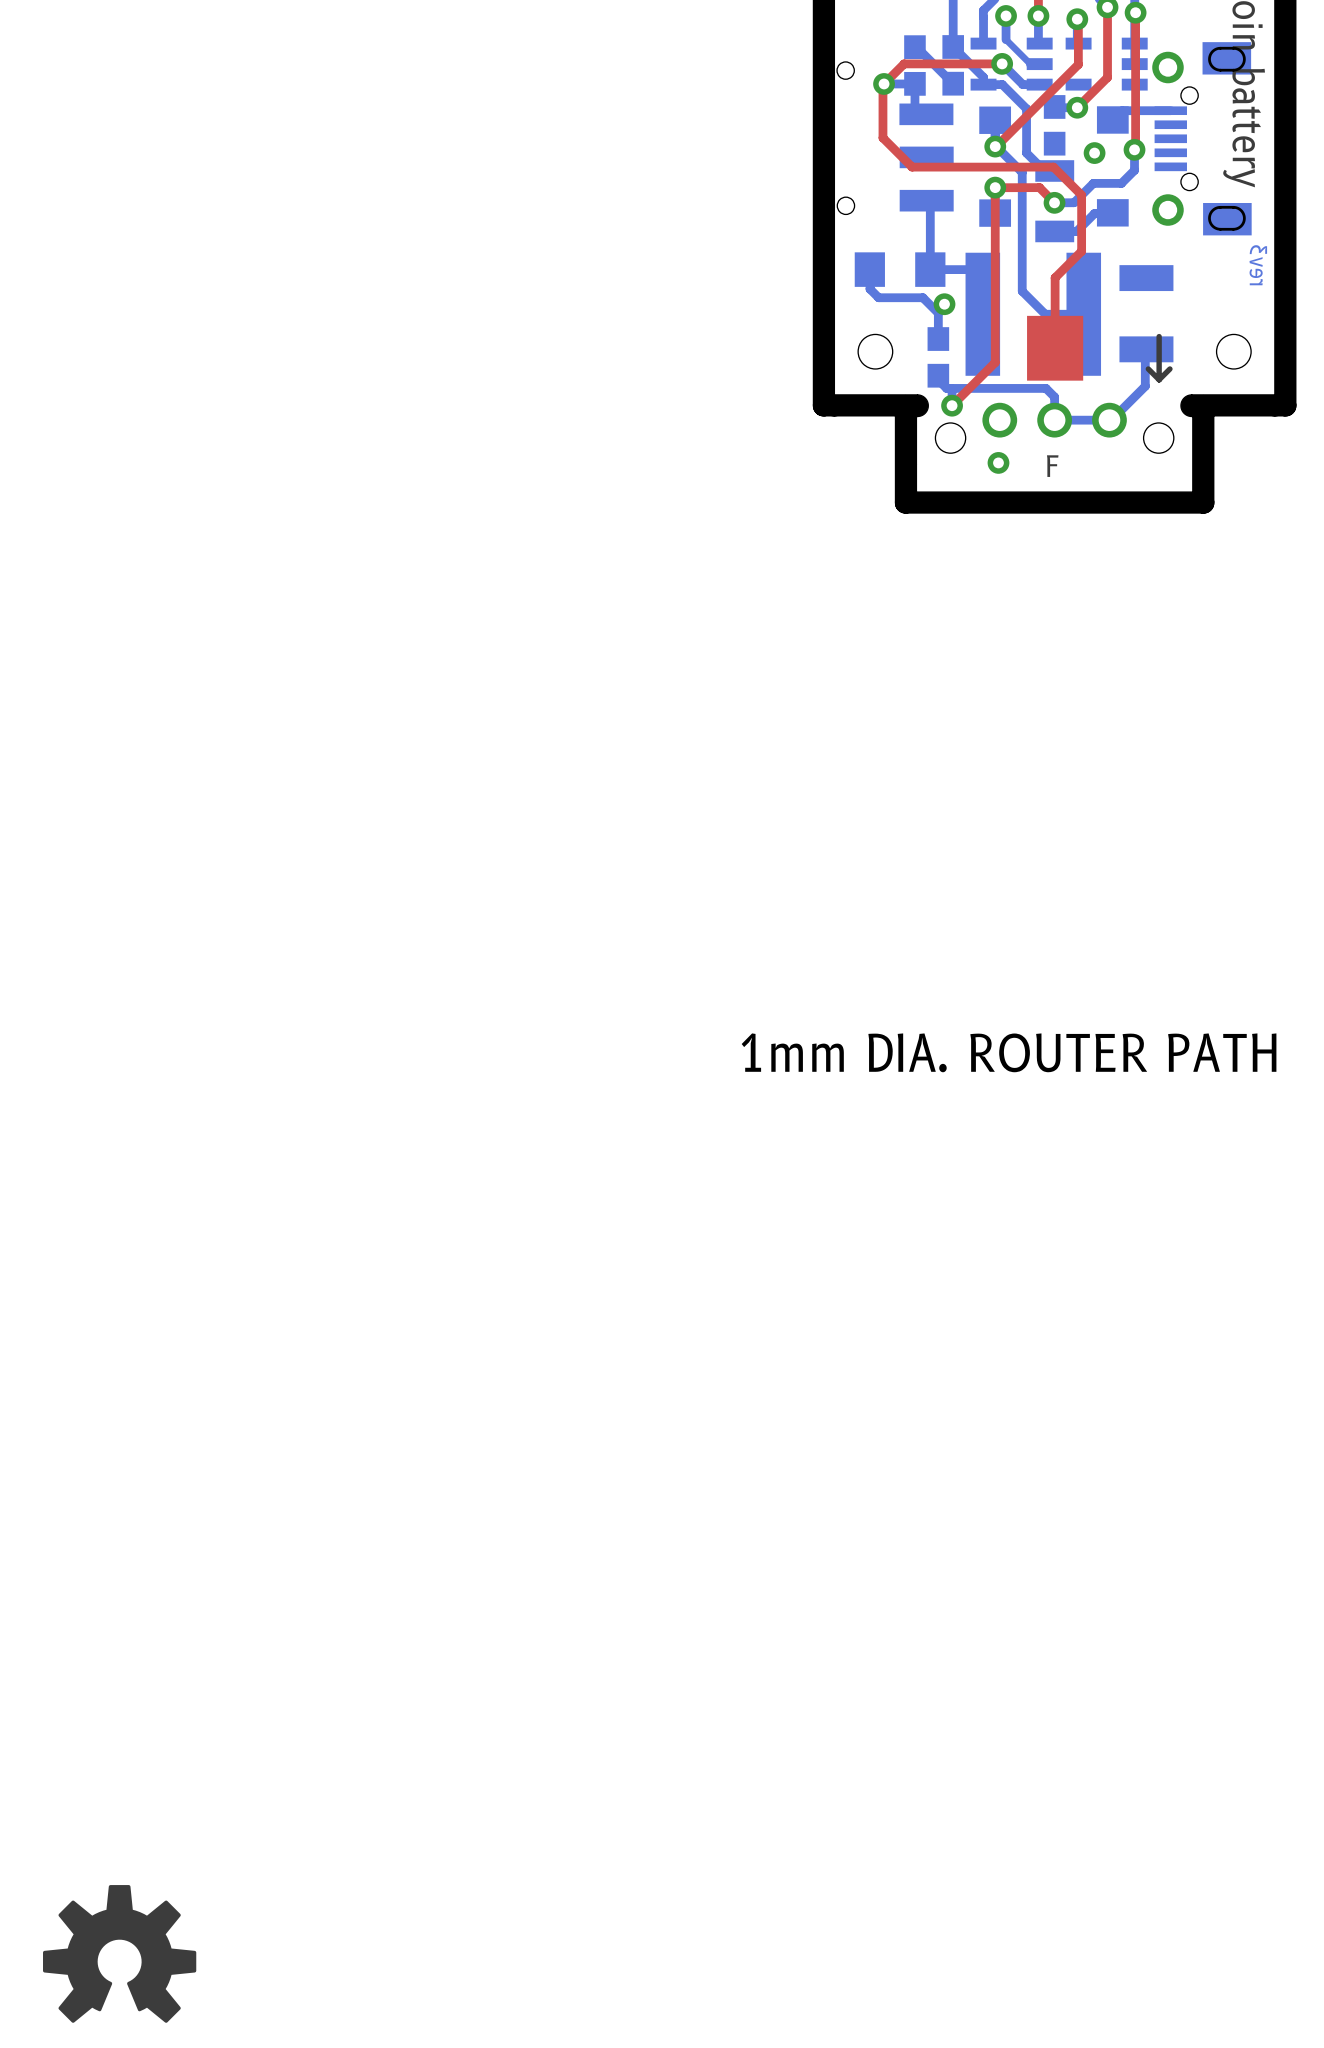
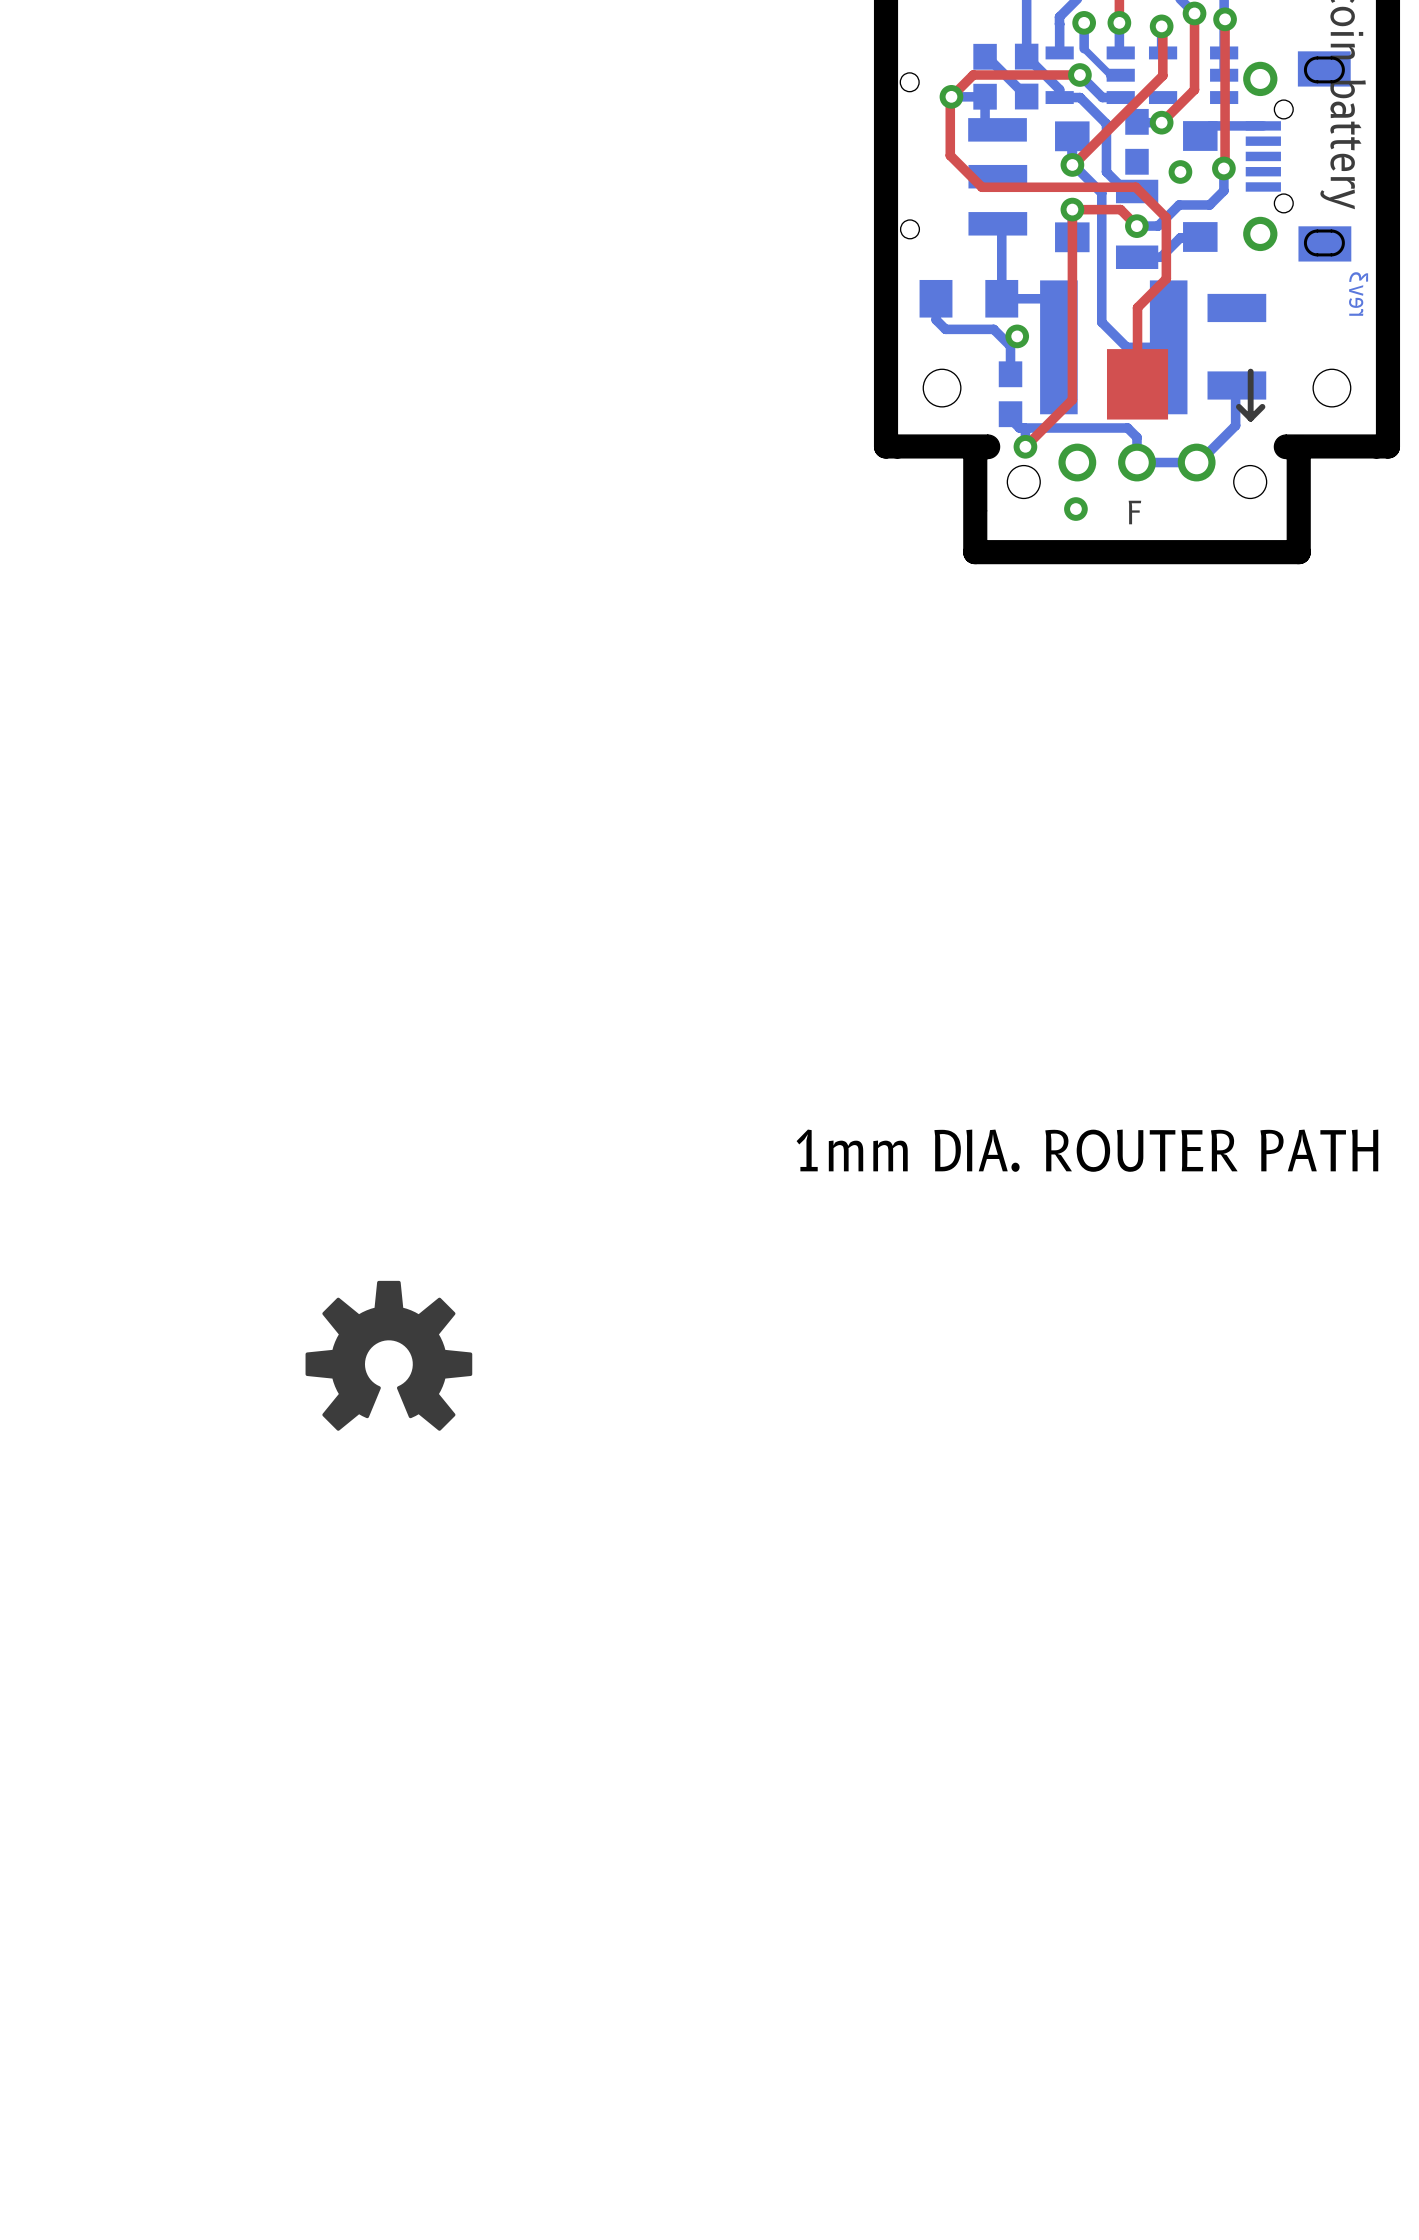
drawing: none -> [305, 1280, 473, 1431]
drawing: [43, 1885, 197, 2023] -> none

